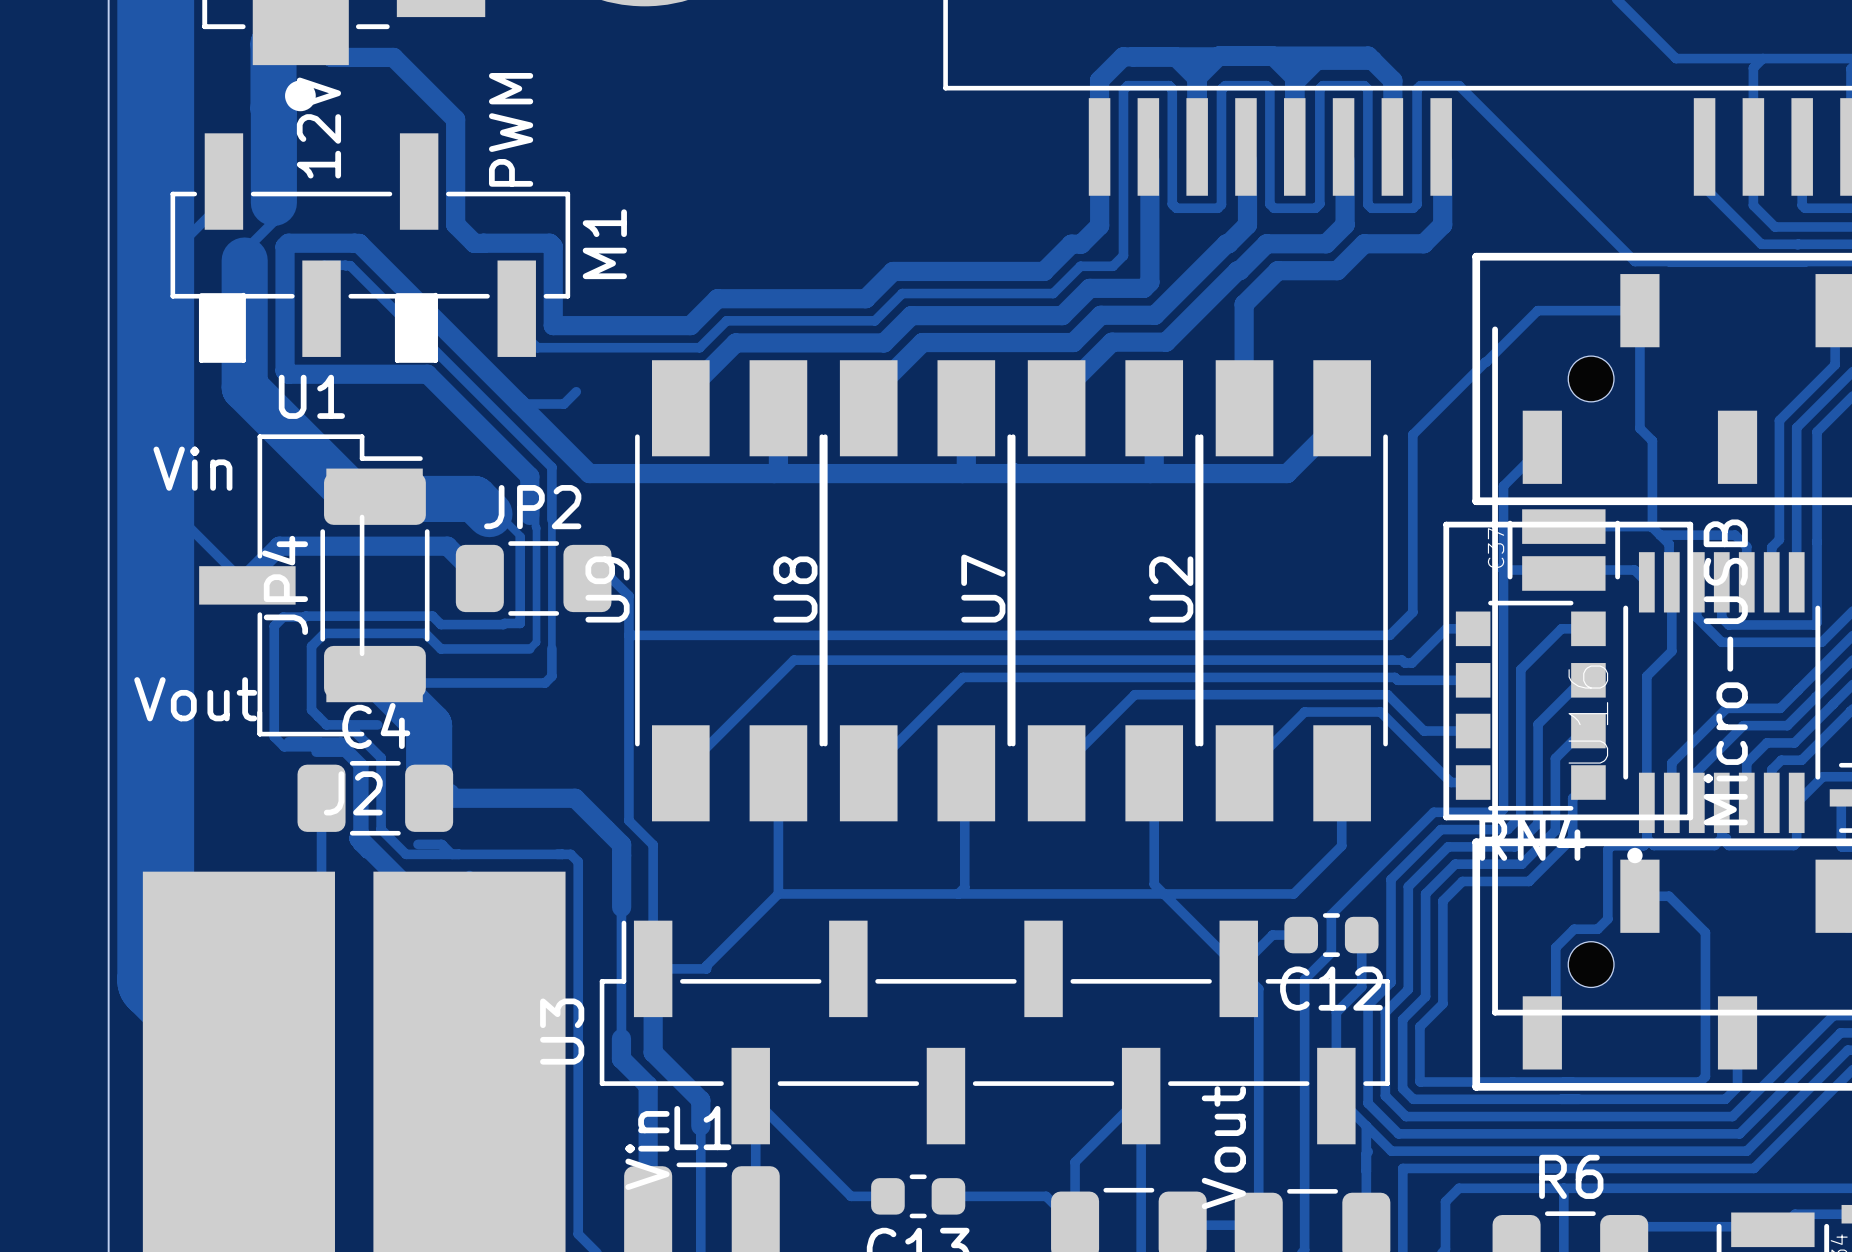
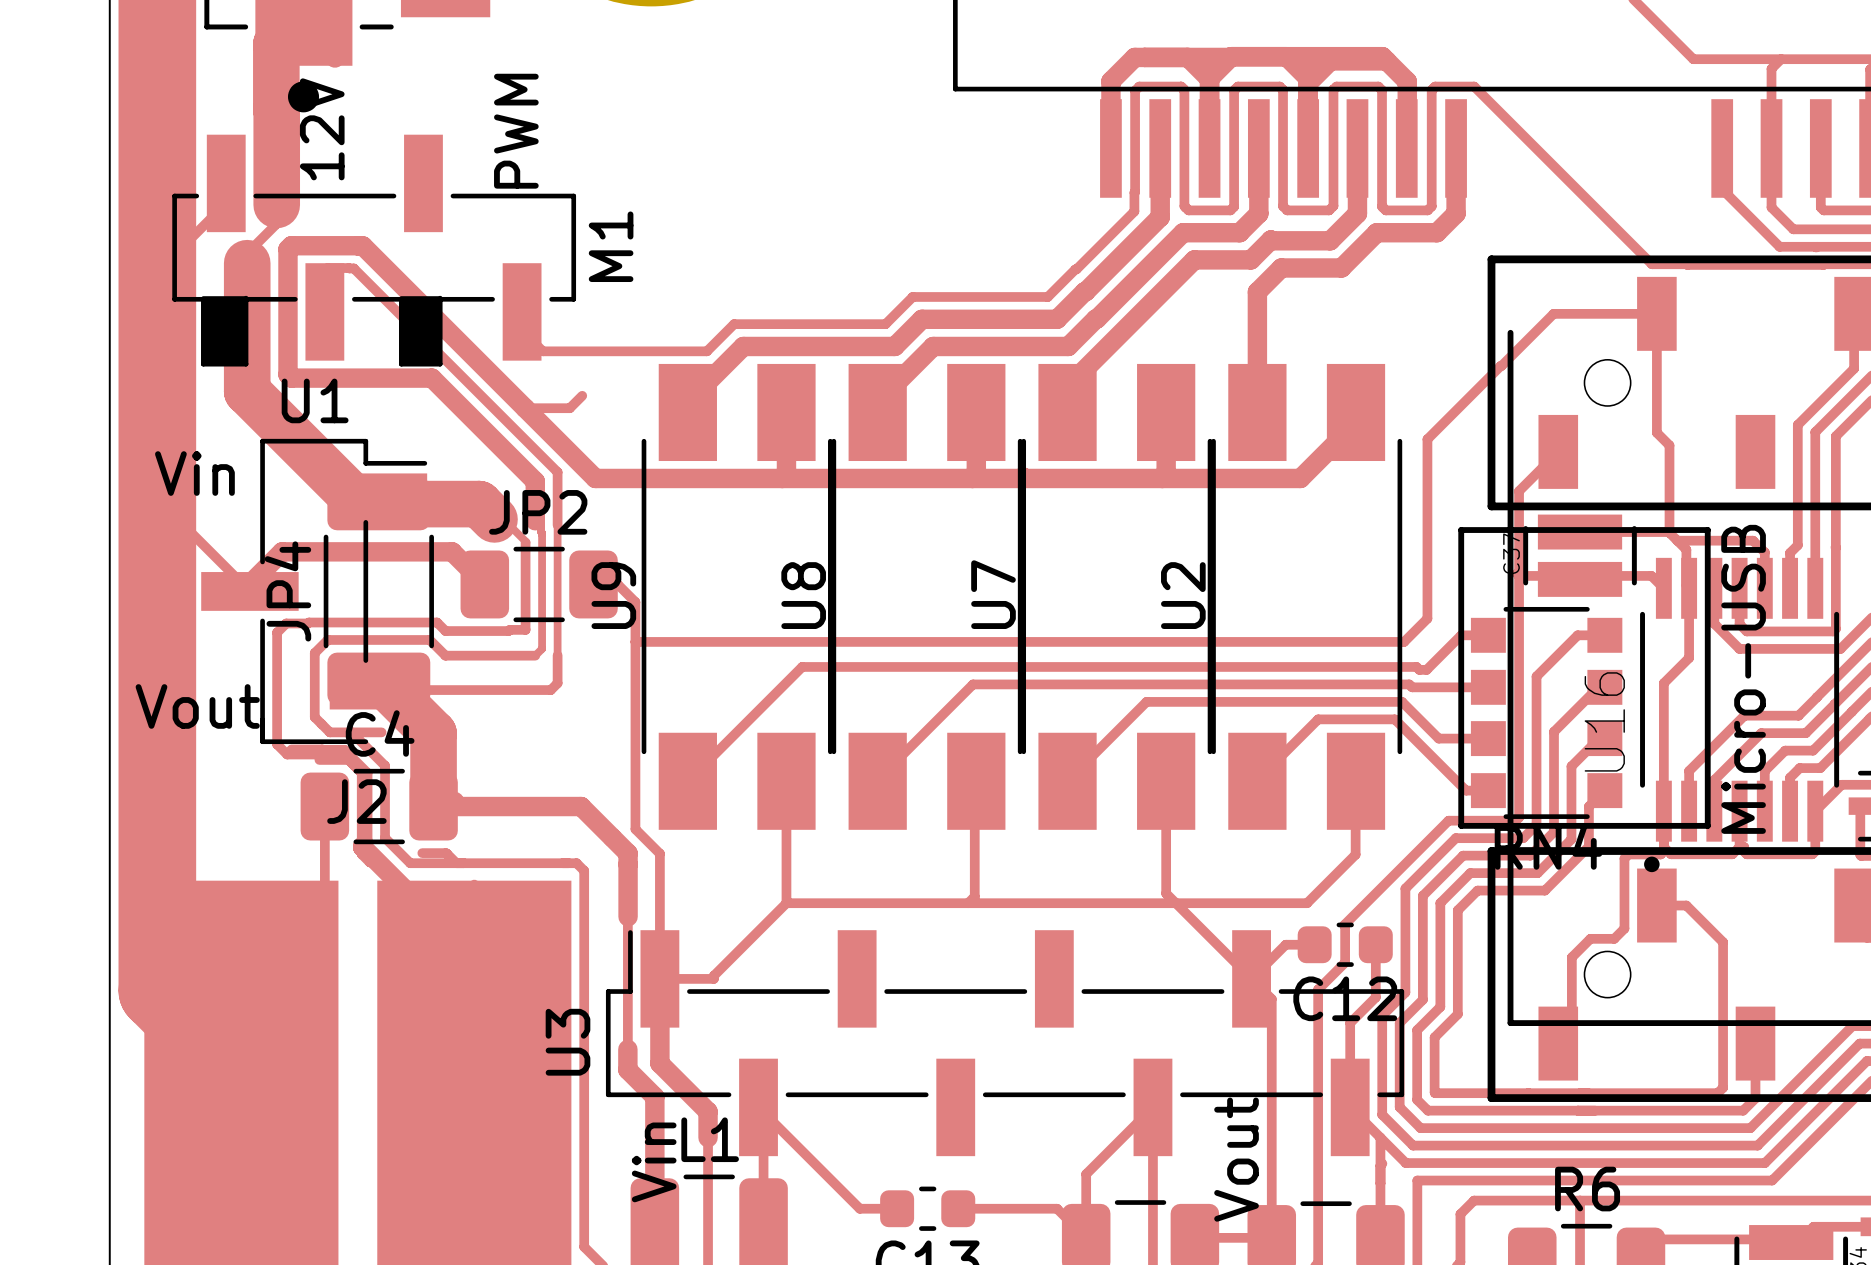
track: (331, 57) (393, 57) (455, 119) (455, 224) (474, 243) (483, 243) -> none
track: none -> (1456, 148) (1456, 213) (1436, 232) (1376, 232) (1341, 267) (1281, 267) (1257, 291) (1257, 412)
track: (1099, 153) (1099, 225) (1081, 244) (1071, 244) (1044, 271) (893, 271) (865, 298) (717, 298) (690, 325) (553, 325) (553, 246) (549, 243) (483, 243) -> none
track: (1149, 160) (1149, 282) (1143, 288) (1089, 288) (1062, 315) (911, 315) (884, 342) -> (1160, 148) (1160, 217) (1057, 319) (921, 319) (893, 346)
track: (1247, 160) (1247, 224) (1154, 315) (1100, 315) (1073, 342) (922, 342) (867, 397) (867, 408) -> (1258, 148) (1258, 213) (1239, 232) (1183, 232) (1068, 346) (933, 346) (877, 401) (877, 412)
track: (1345, 160) (1345, 224) (1326, 243) (1266, 243) (1166, 342) (1111, 342) (1056, 397) -> (1357, 148) (1357, 213) (1330, 240) (1270, 240) (1251, 259) (1194, 259) (1067, 386) (1067, 401)
track: (1442, 160) (1442, 224) (1423, 243) (1364, 243) (1337, 270) (1277, 270) (1244, 304) (1244, 397) -> none
track: (1123, 189) (1123, 255) (1112, 266) (1080, 266) (1053, 293) (902, 293) (874, 320) -> (1135, 191) (1134, 211) (1047, 296) (912, 296) (883, 324)

